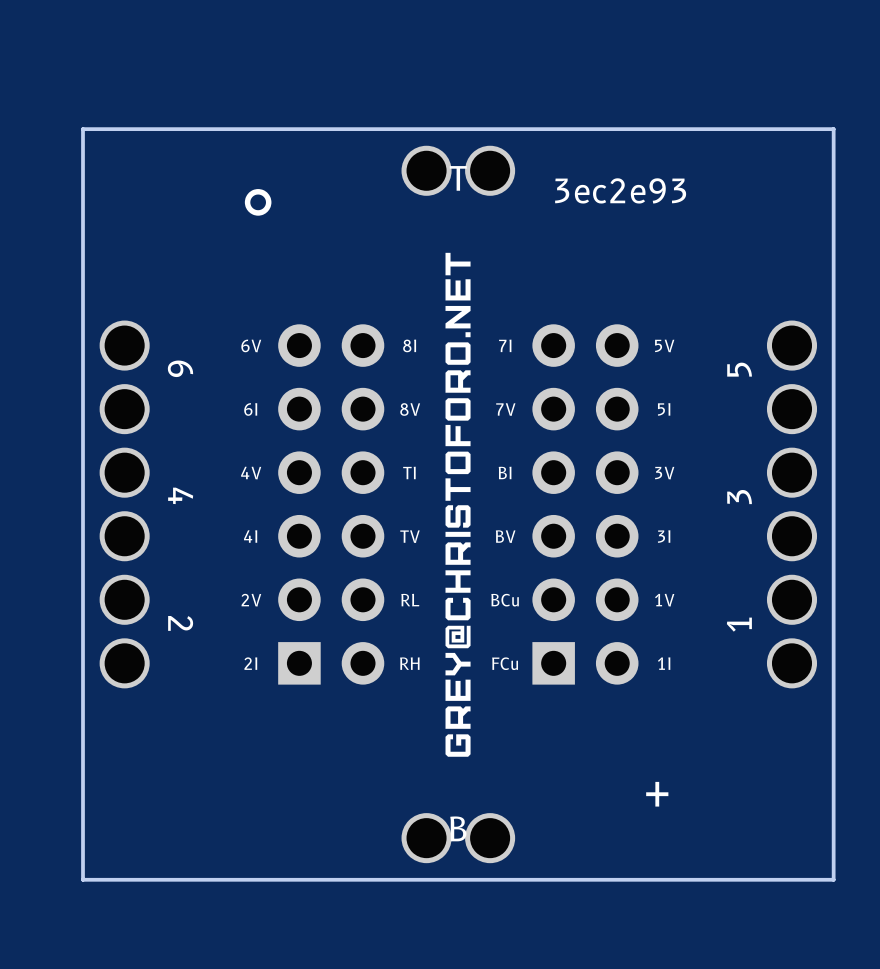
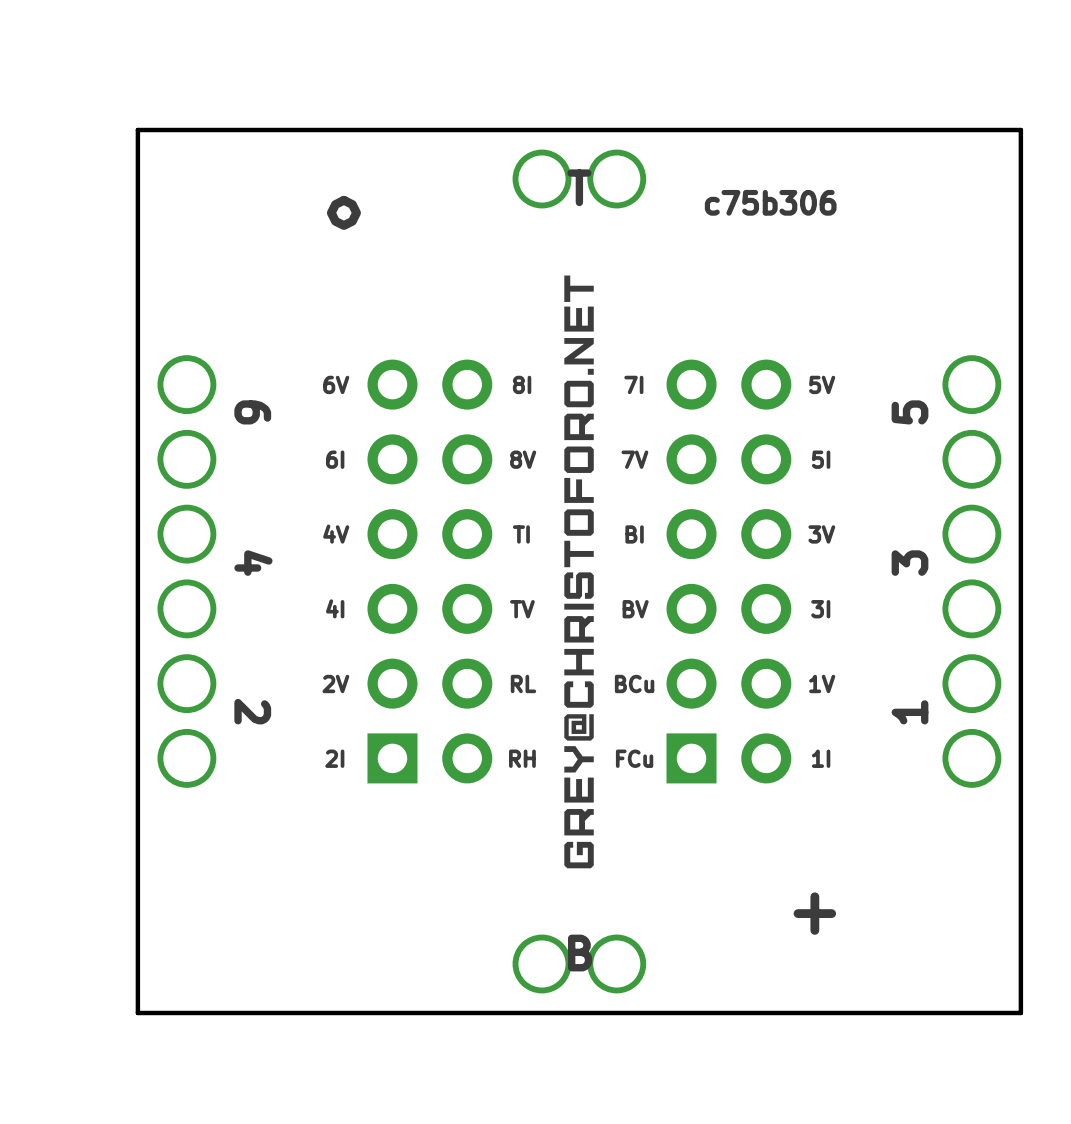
text: 3ec2e93 (620, 190) -> c75b306 (770, 202)

